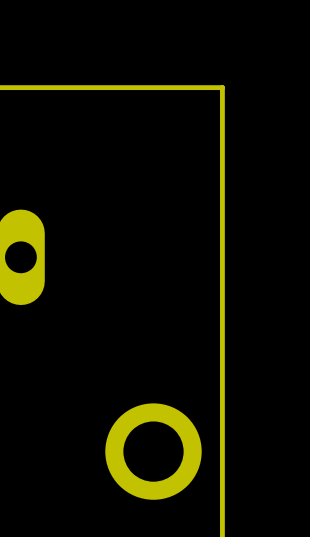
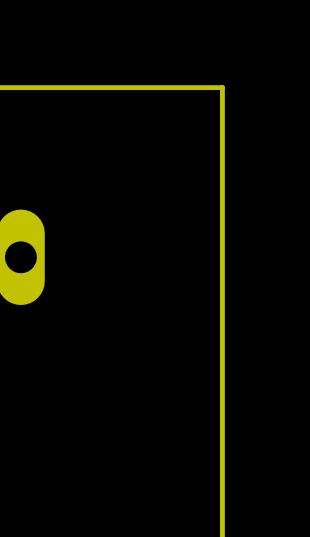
part: (153, 451) -> none

